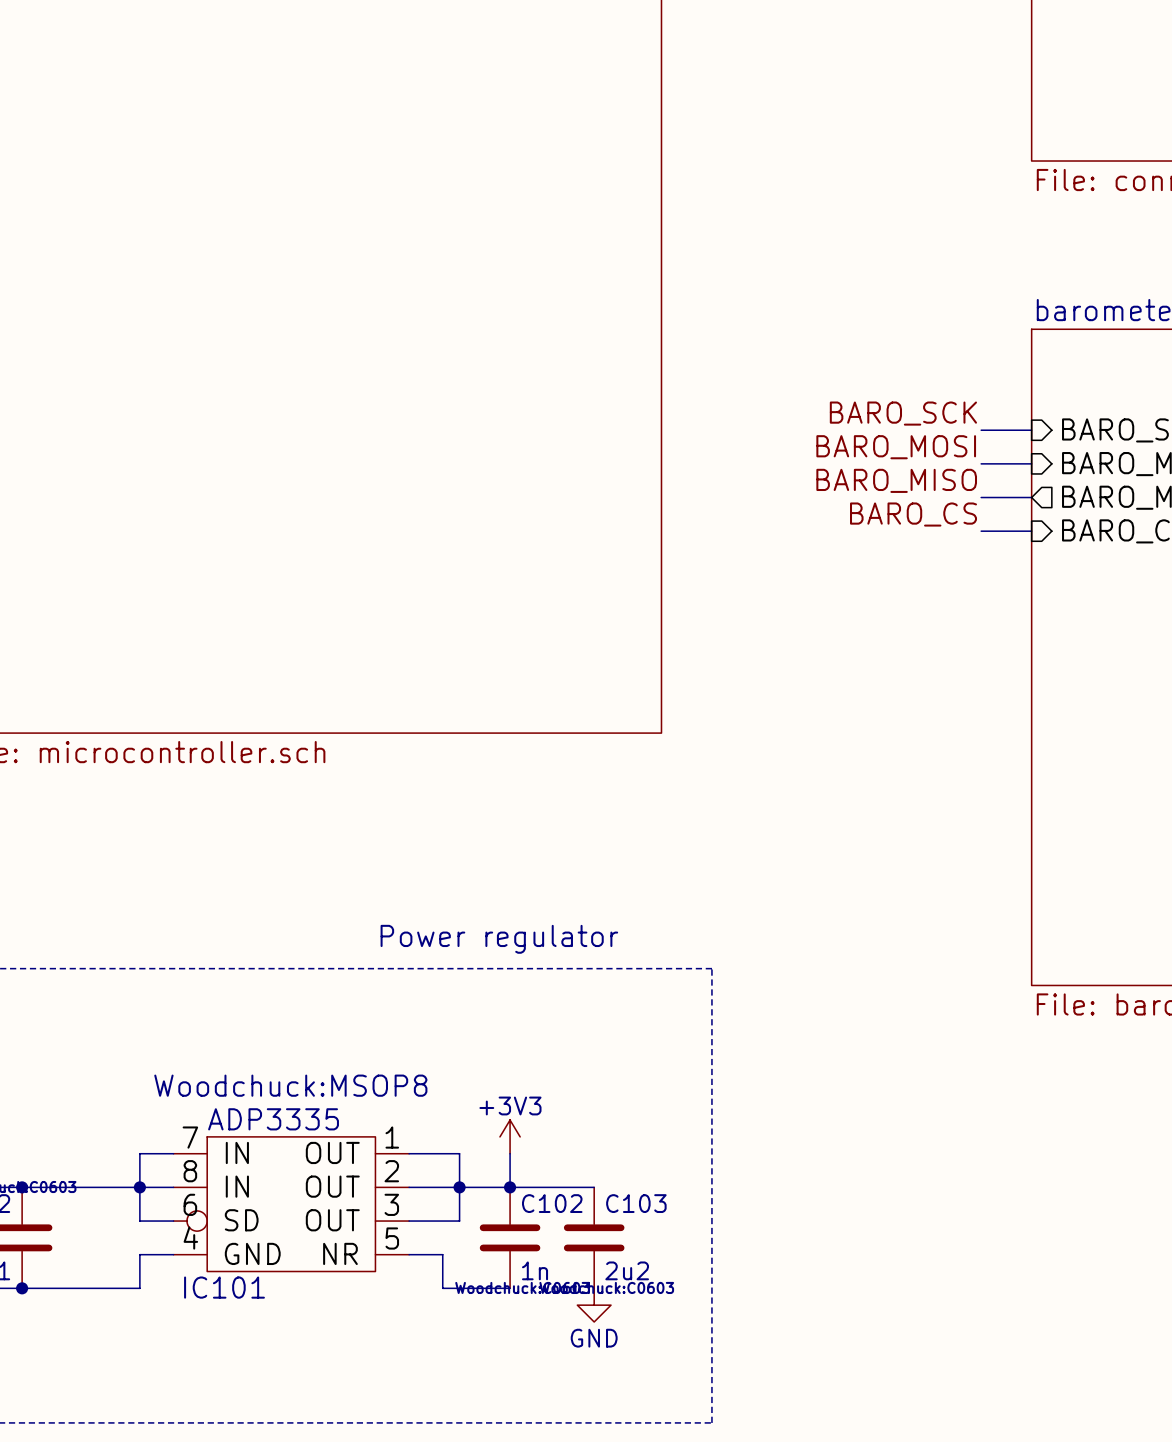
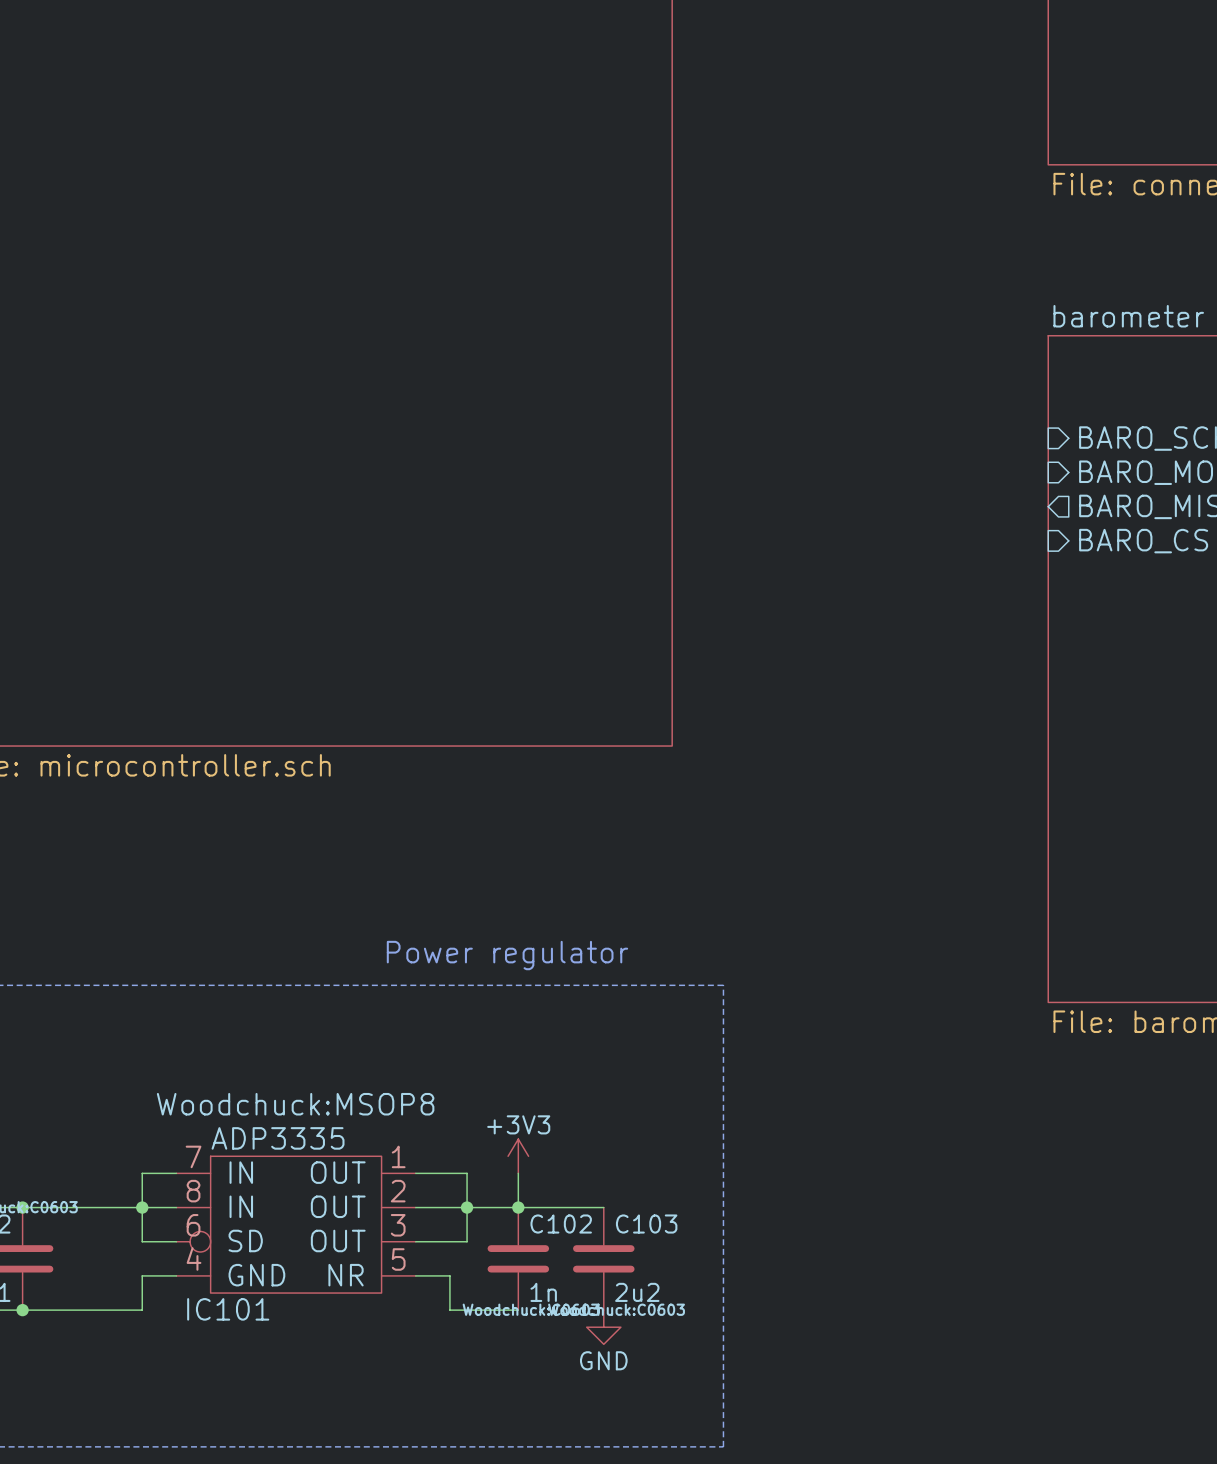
label: BARO_SCK (903, 413) -> none
wire: (981, 430) (1031, 430) -> none
label: BARO_MOSI (896, 447) -> none
wire: (981, 463) (1031, 463) -> none
label: BARO_MISO (896, 480) -> none
wire: (981, 497) (1031, 497) -> none
label: BARO_CS (913, 514) -> none
wire: (981, 531) (1031, 531) -> none

